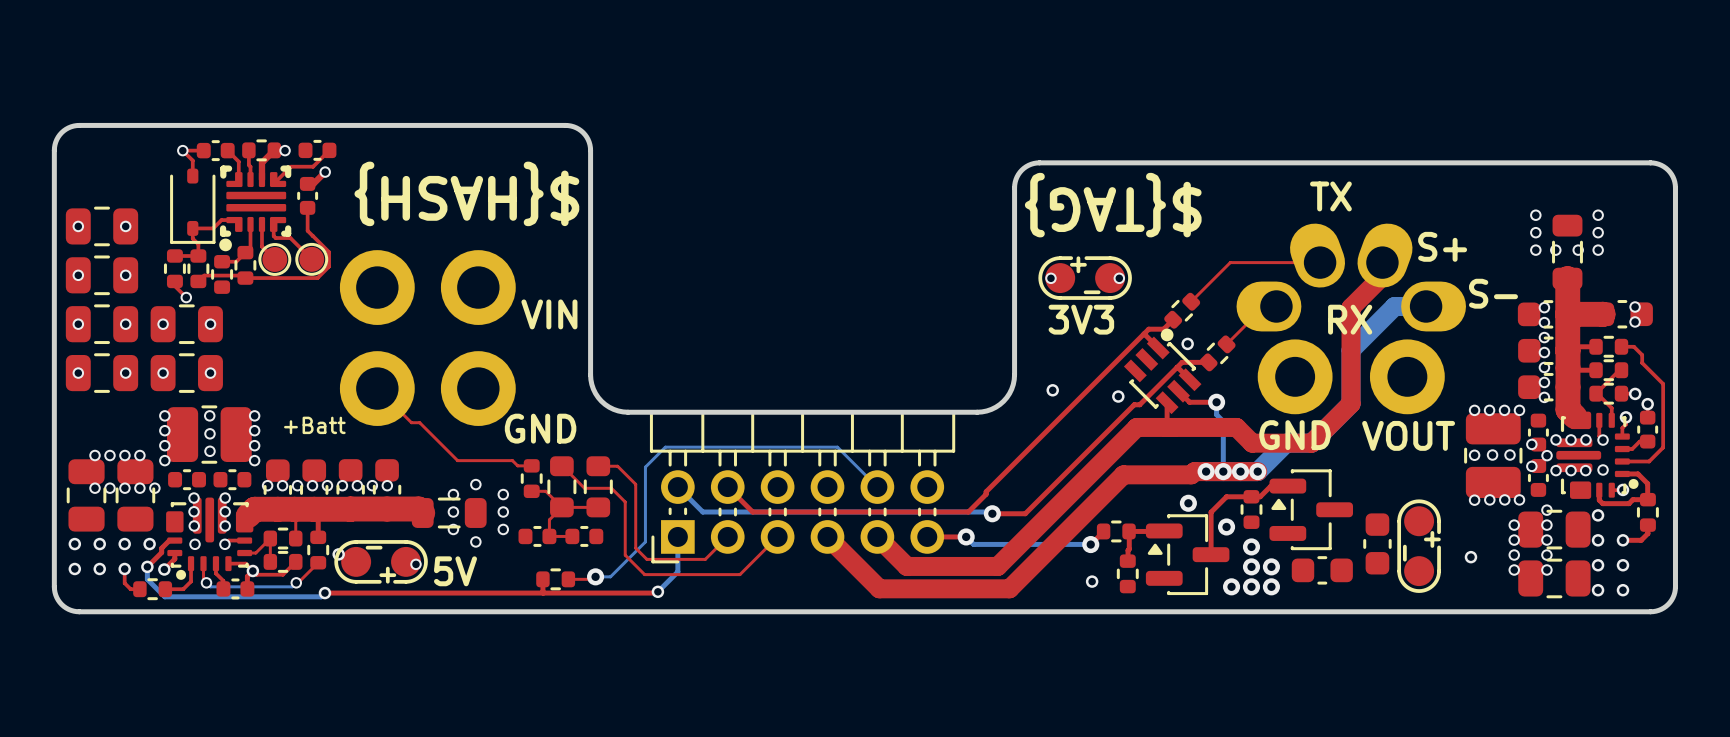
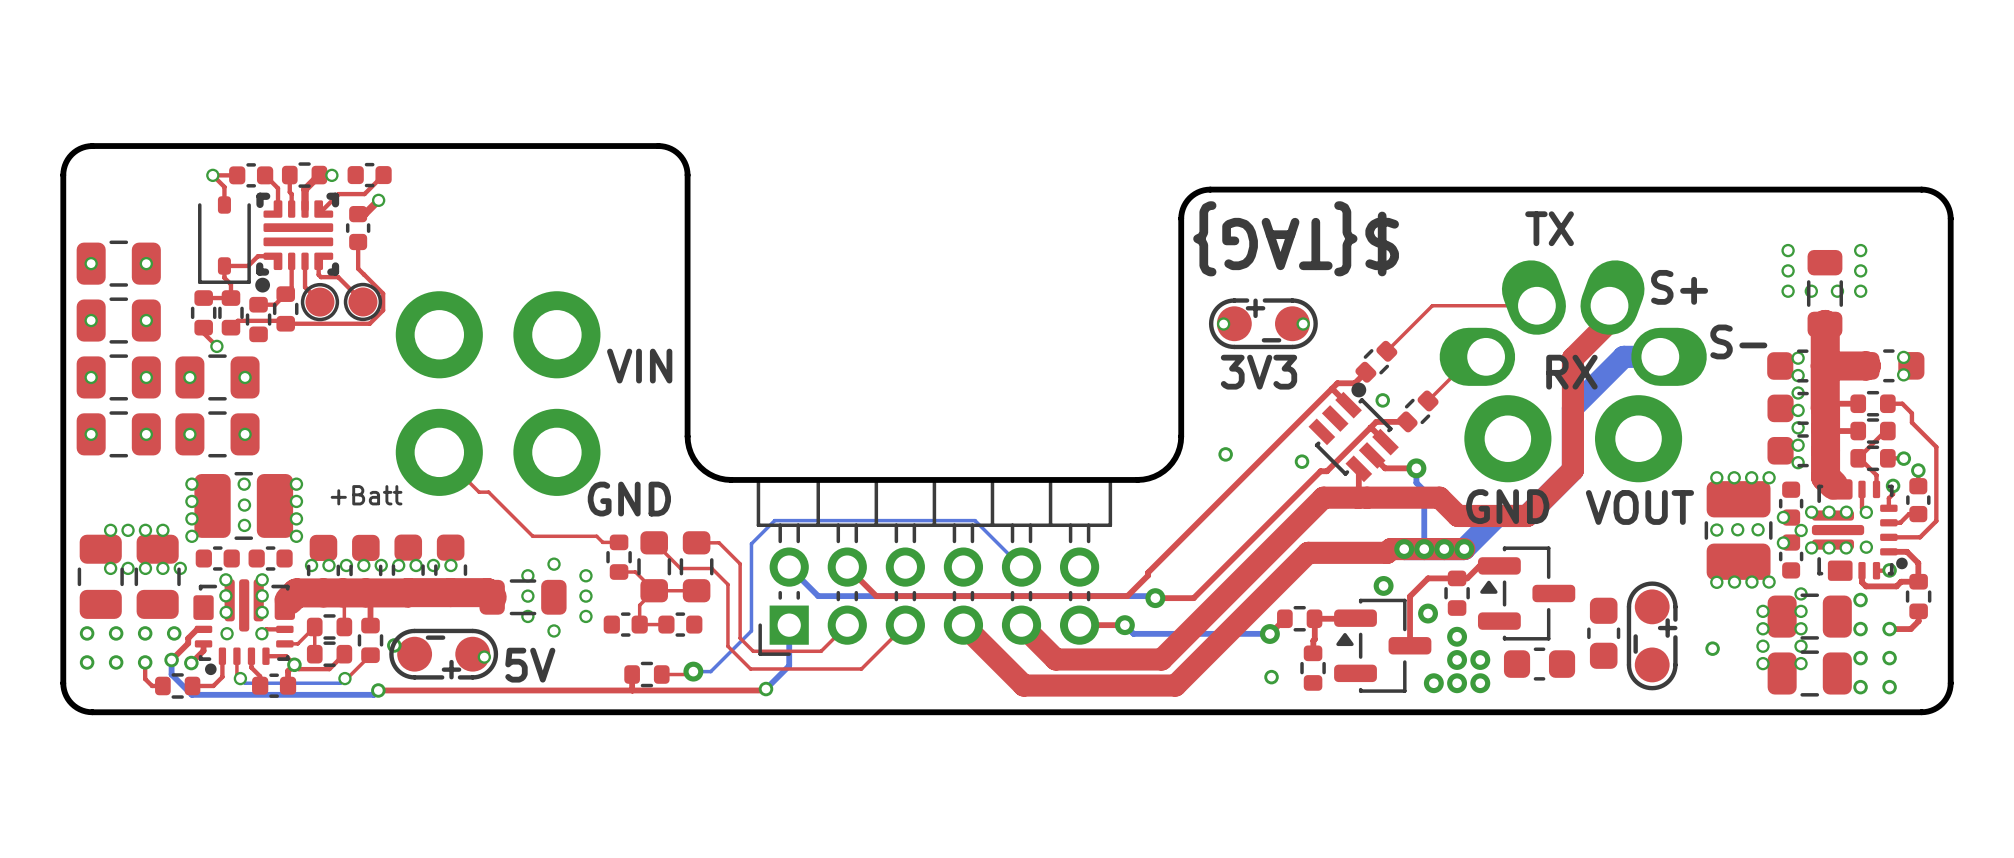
text: ${HASH} (466, 193) -> none

